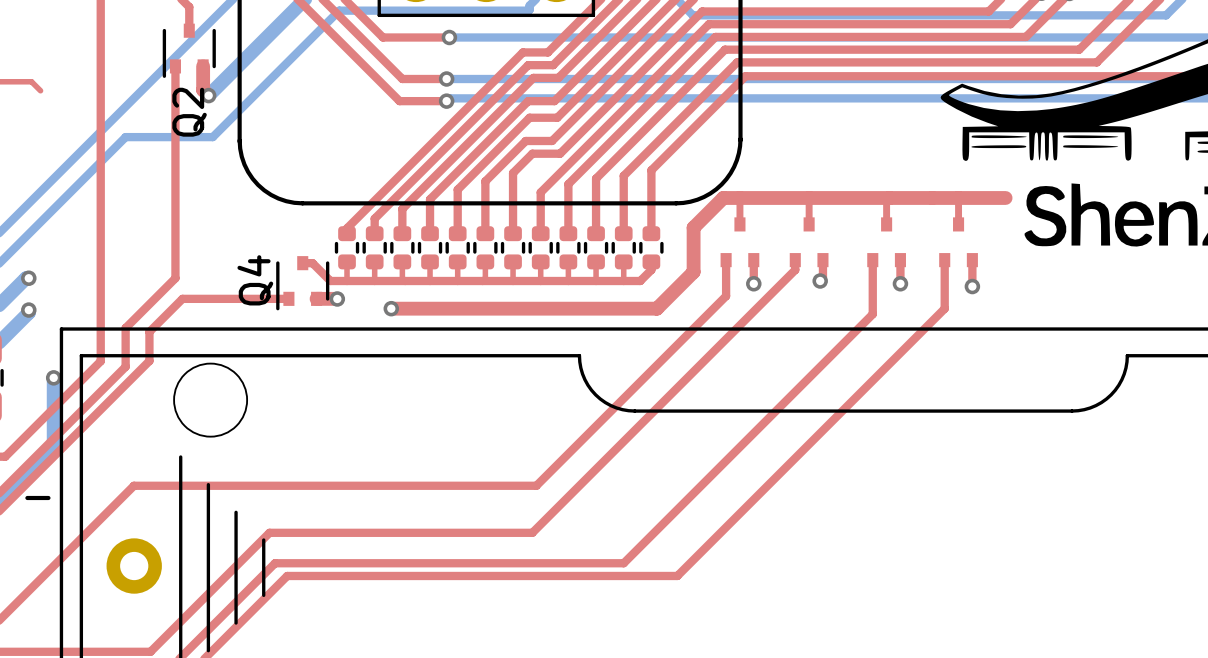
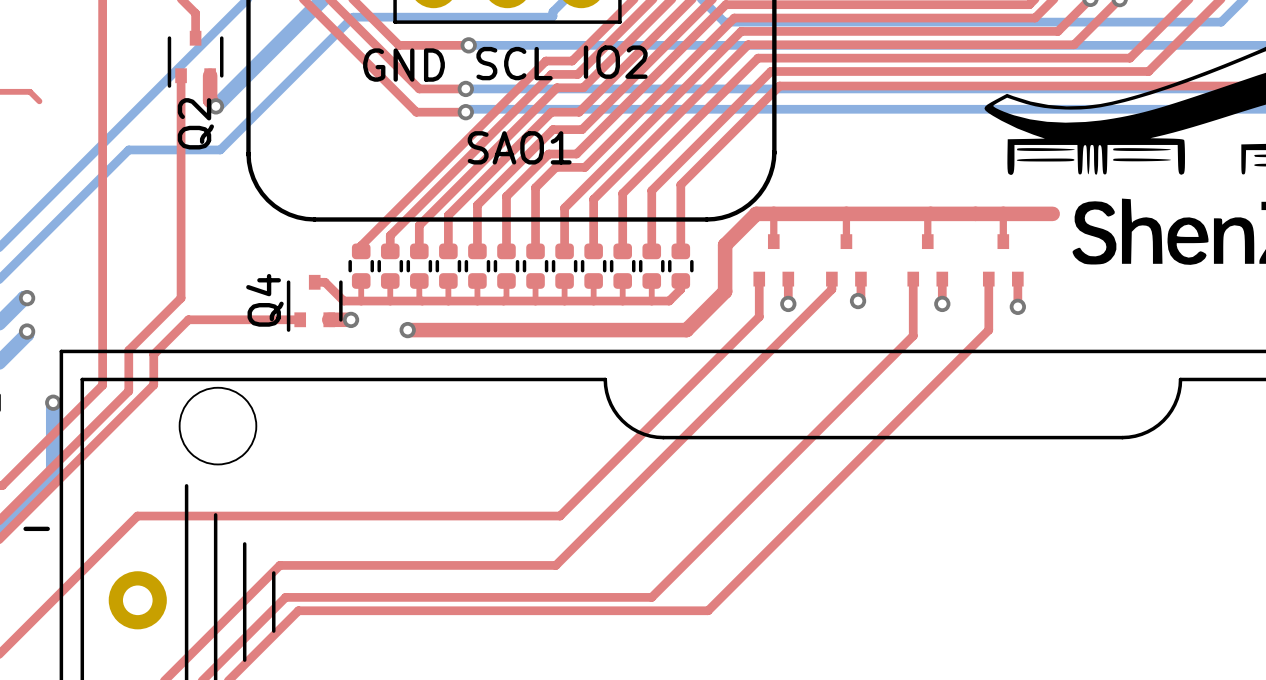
text: none -> IO2 (615, 62)
text: none -> SCL (514, 63)
text: none -> GND (403, 65)
text: none -> SAO1 (519, 147)

